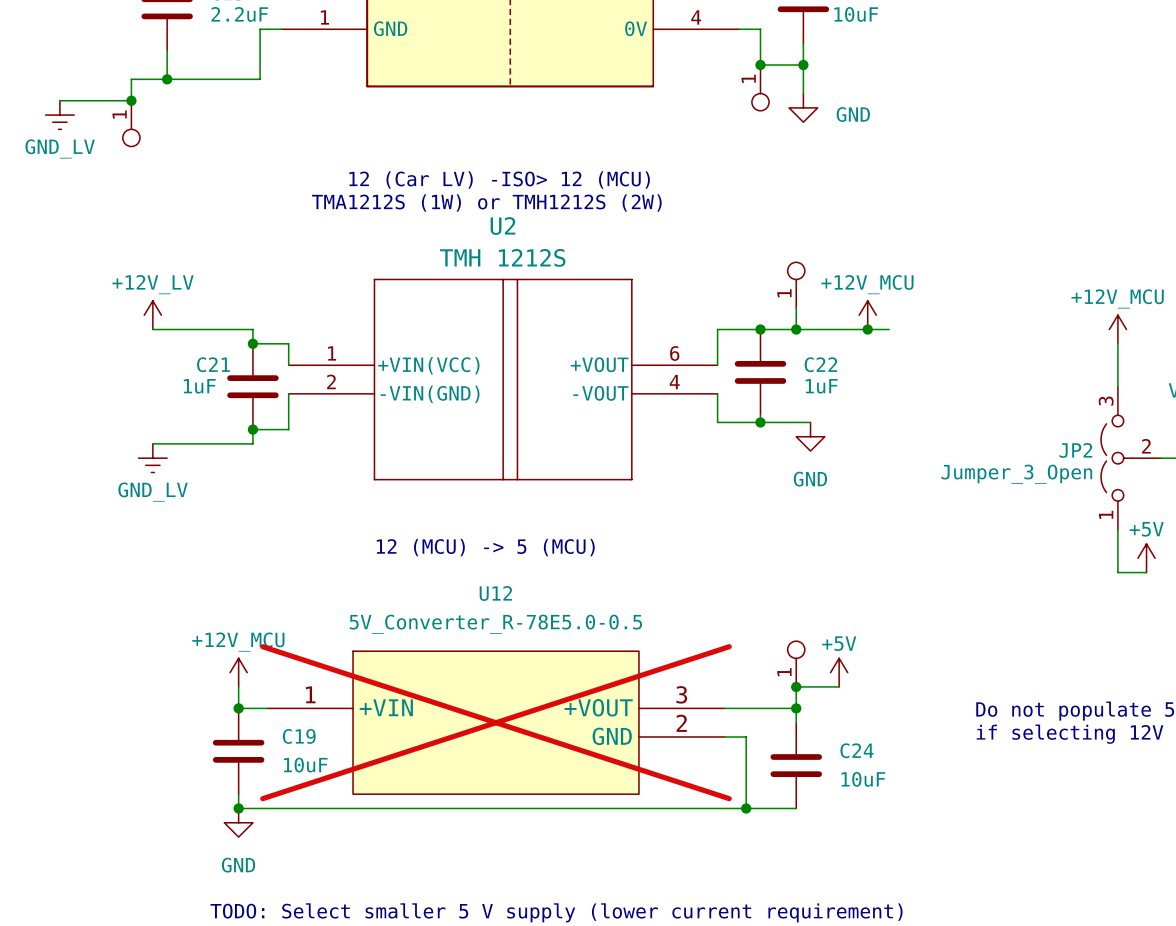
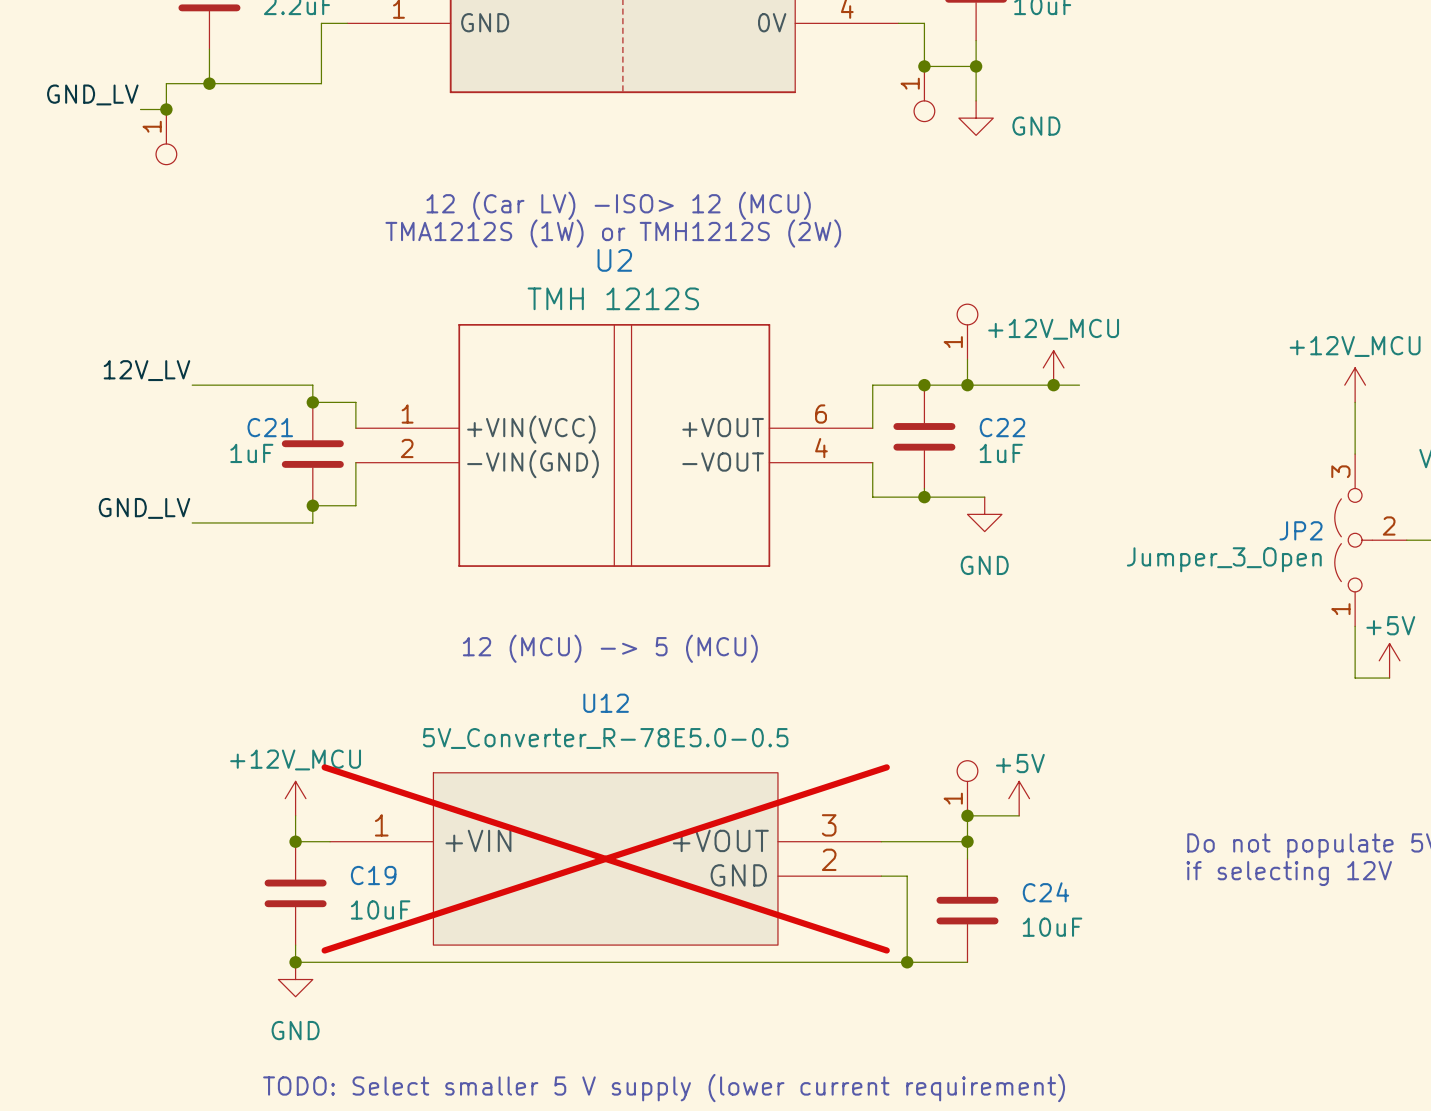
label: none -> GND_LV (92, 94)
wire: (59, 100) (109, 100) -> none
power symbol: GND_LV (59, 115) -> none
power symbol: +12V_LV (152, 315) -> none
label: none -> 12V_LV (146, 370)
label: none -> GND_LV (144, 508)
power symbol: GND_LV (152, 458) -> none

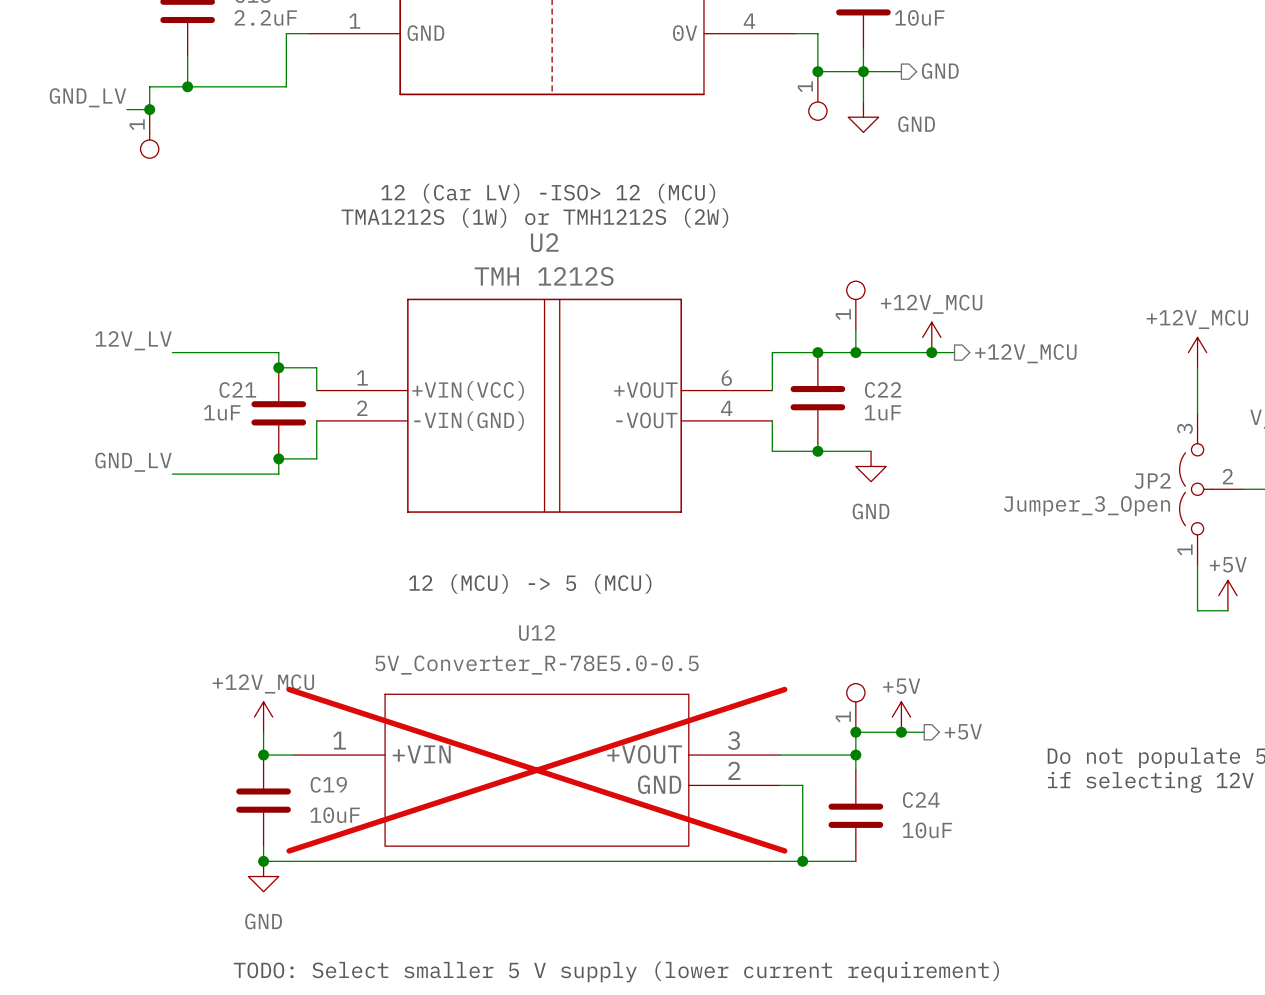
hierarchical label: none -> GND (940, 71)
wire: none -> (863, 71) (901, 71)
hierarchical label: none -> +12V_MCU (1025, 353)
wire: none -> (901, 732) (924, 732)
junction: none -> (901, 732)
hierarchical label: none -> +5V (963, 731)

